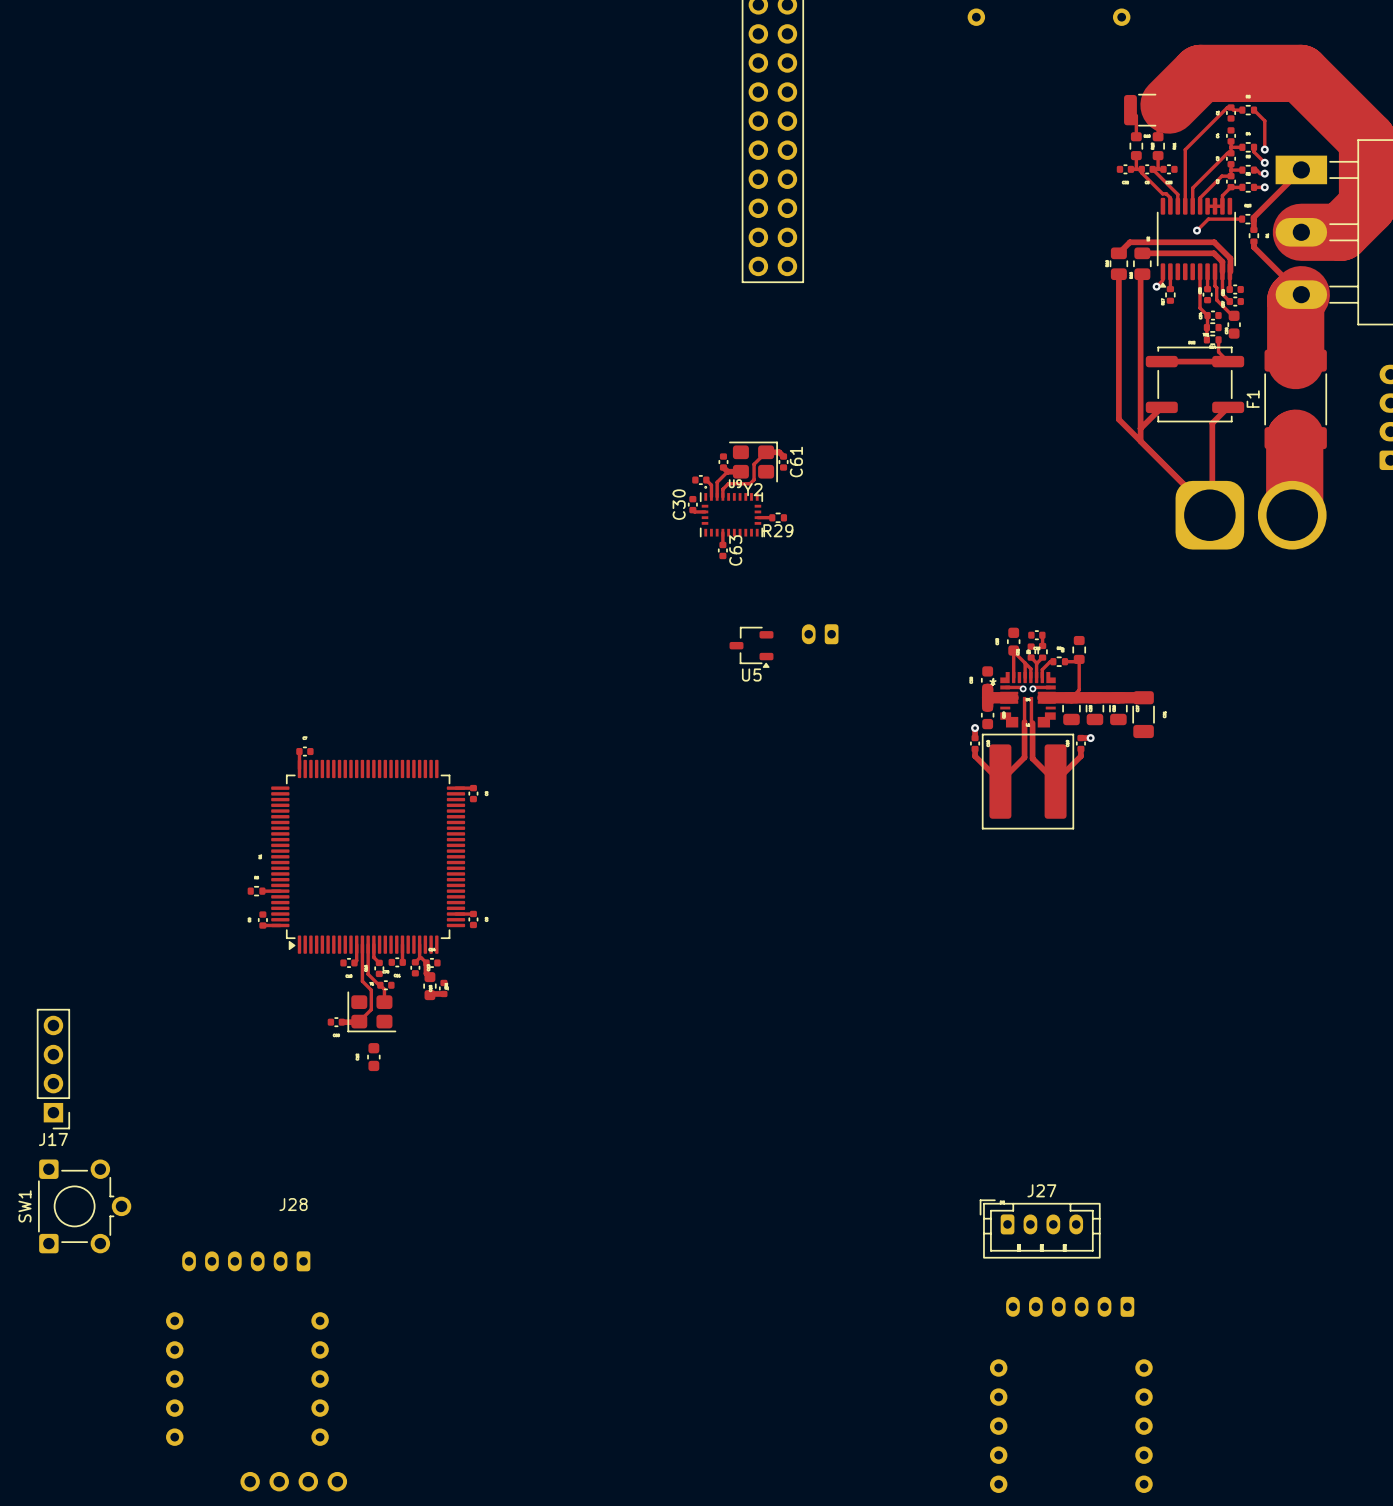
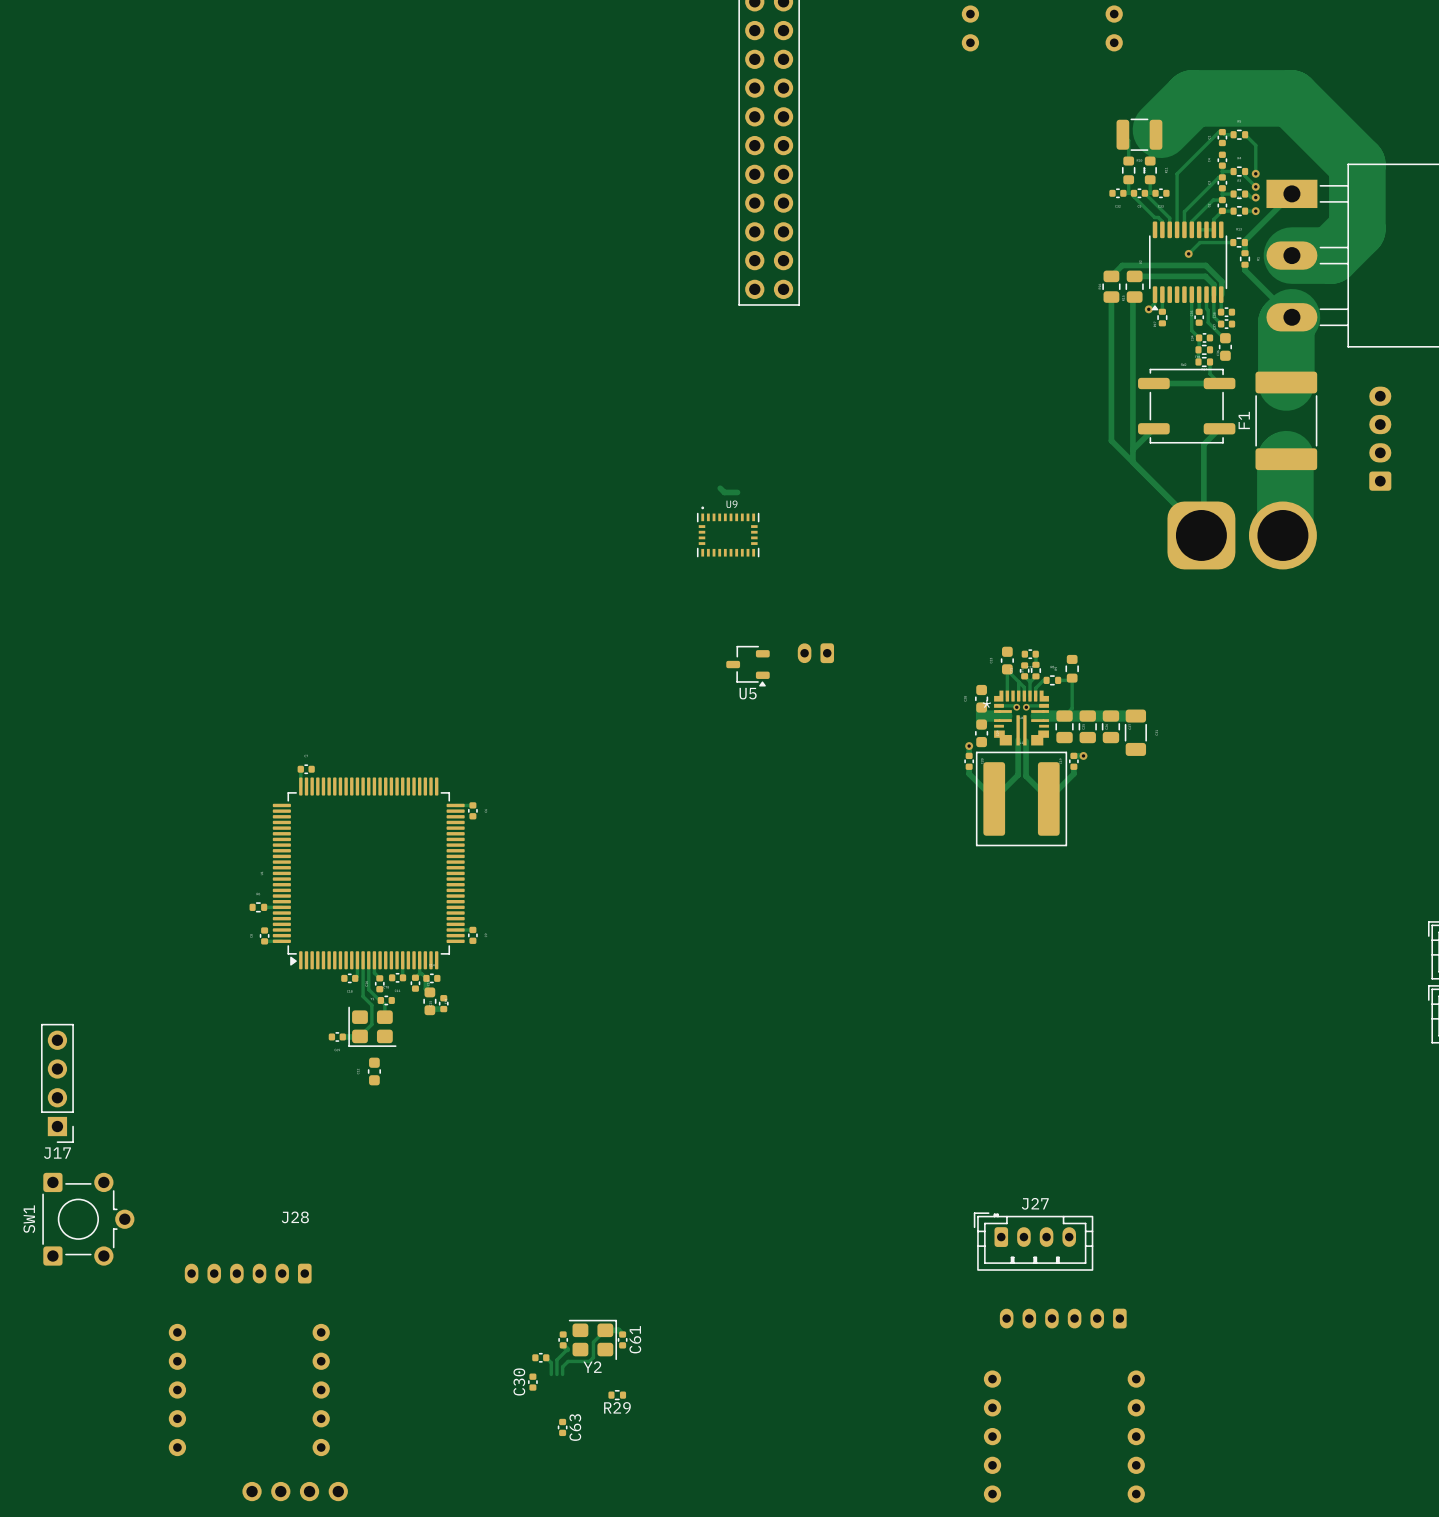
track: (783, 456) (779, 452) (766, 452) (754, 464) (754, 479) (750, 483) (728, 483) (722, 489) (722, 496) -> none
part: (723, 462) -> none
Y2 position: (753, 462) -> (592, 1339)
C61 position: (783, 462) -> (622, 1339)
track: (727, 471) (717, 482) (717, 496) -> none
part: (700, 480) -> none
track: (706, 480) (711, 485) (711, 496) -> none
C30 position: (692, 504) -> (532, 1382)
track: (692, 510) (694, 511) (705, 511) -> none
track: (757, 517) (772, 517) -> none
R29 position: (778, 517) -> (617, 1395)
track: (722, 532) (722, 544) -> none
C63 position: (722, 550) -> (562, 1427)
track: none -> (622, 1334) (618, 1330) (605, 1330) (593, 1342) (593, 1357) (589, 1361) (568, 1361) (562, 1366) (562, 1374)
part: none -> (563, 1339)
track: none -> (563, 1345) (567, 1349) (556, 1359) (556, 1374)
part: none -> (540, 1357)
track: none -> (546, 1357) (551, 1362) (551, 1374)

